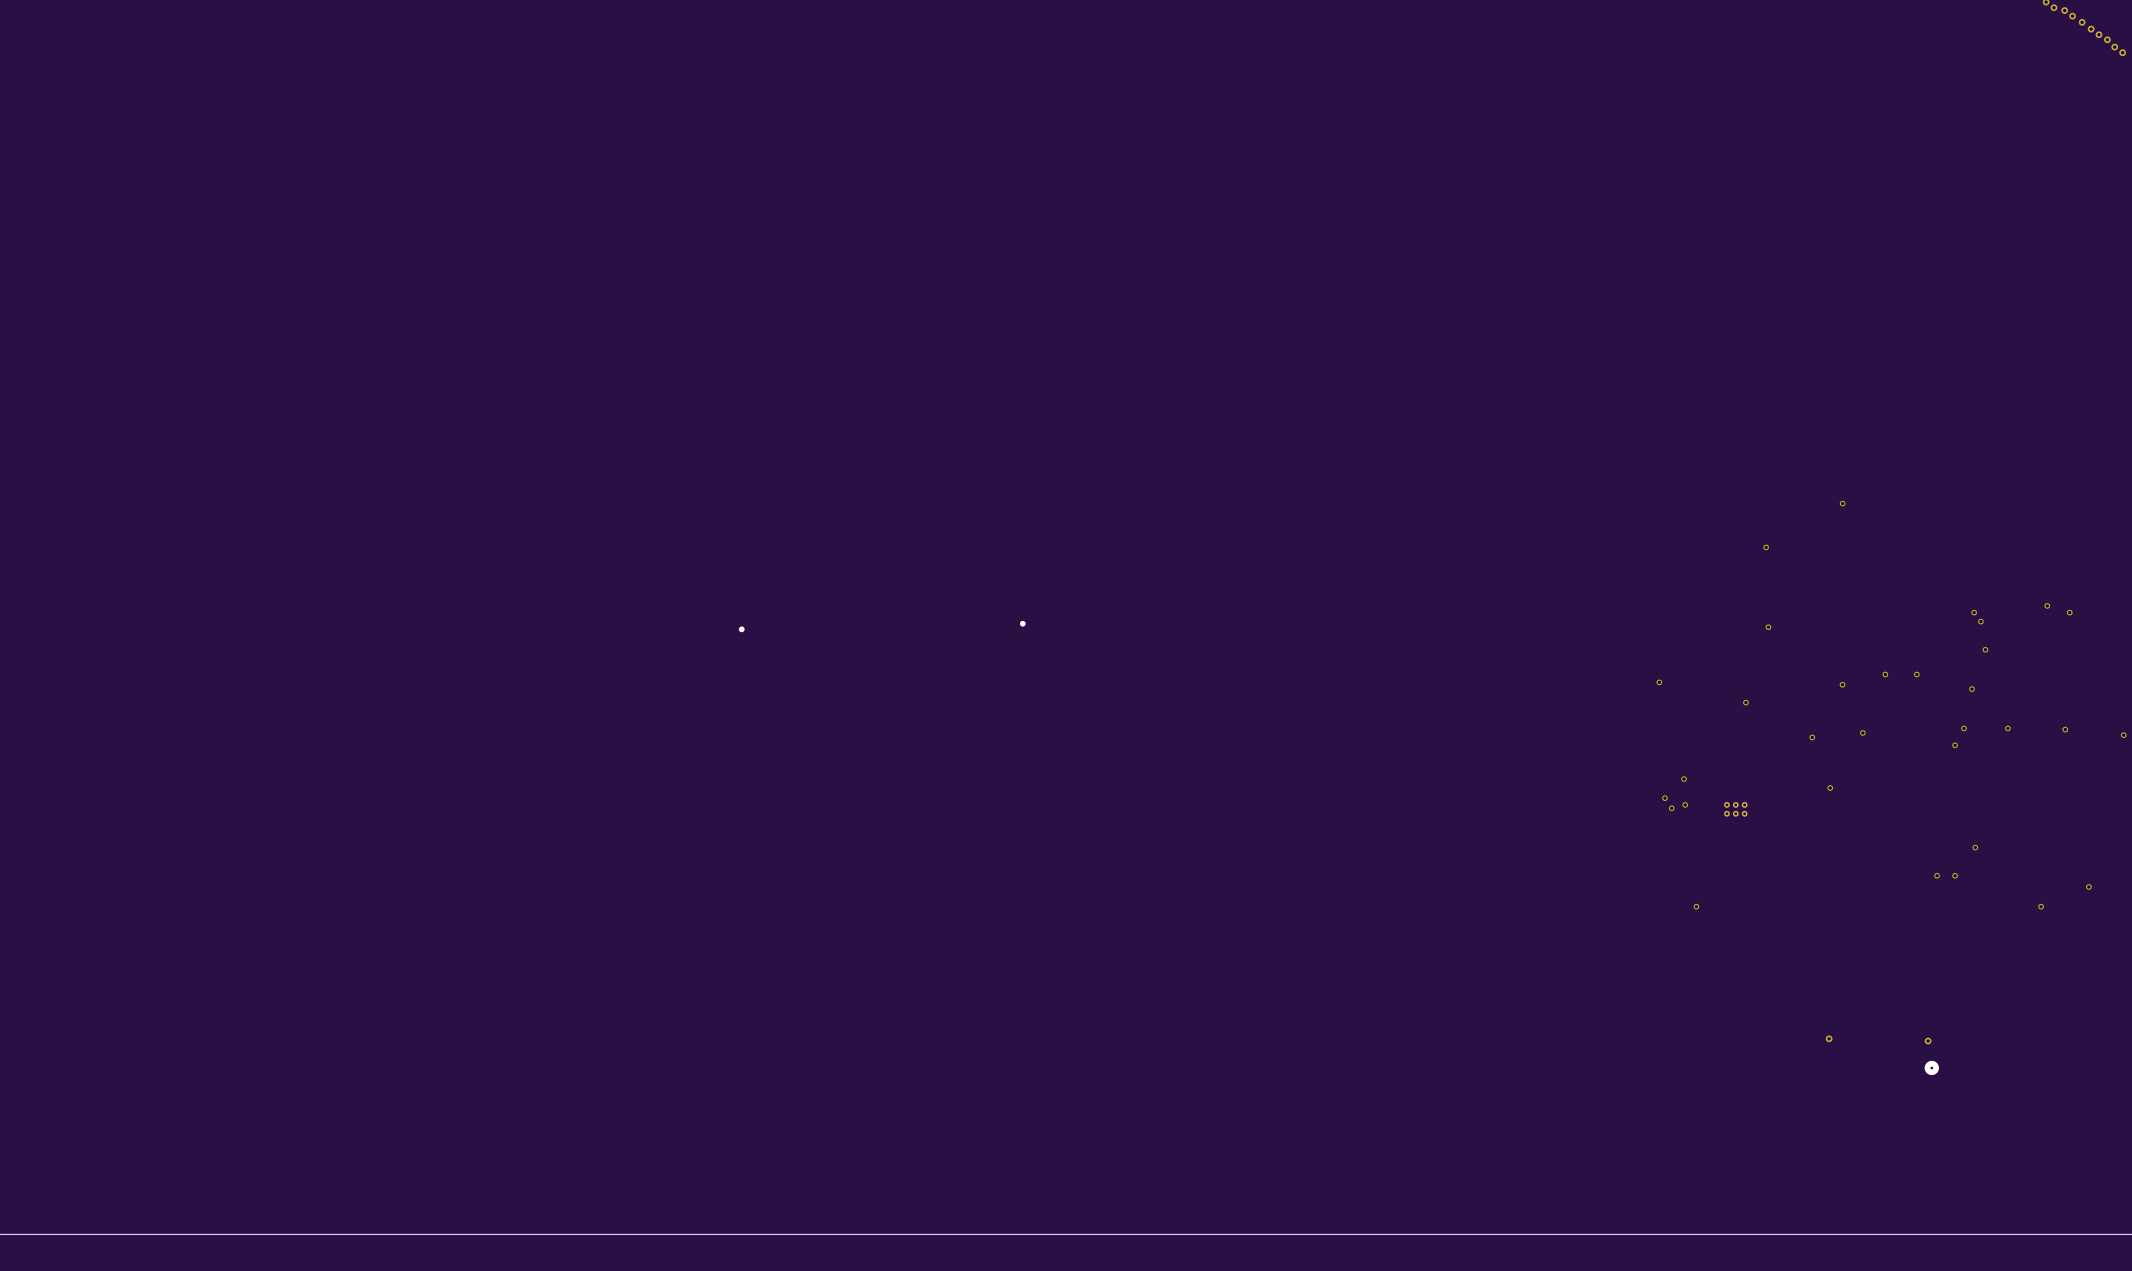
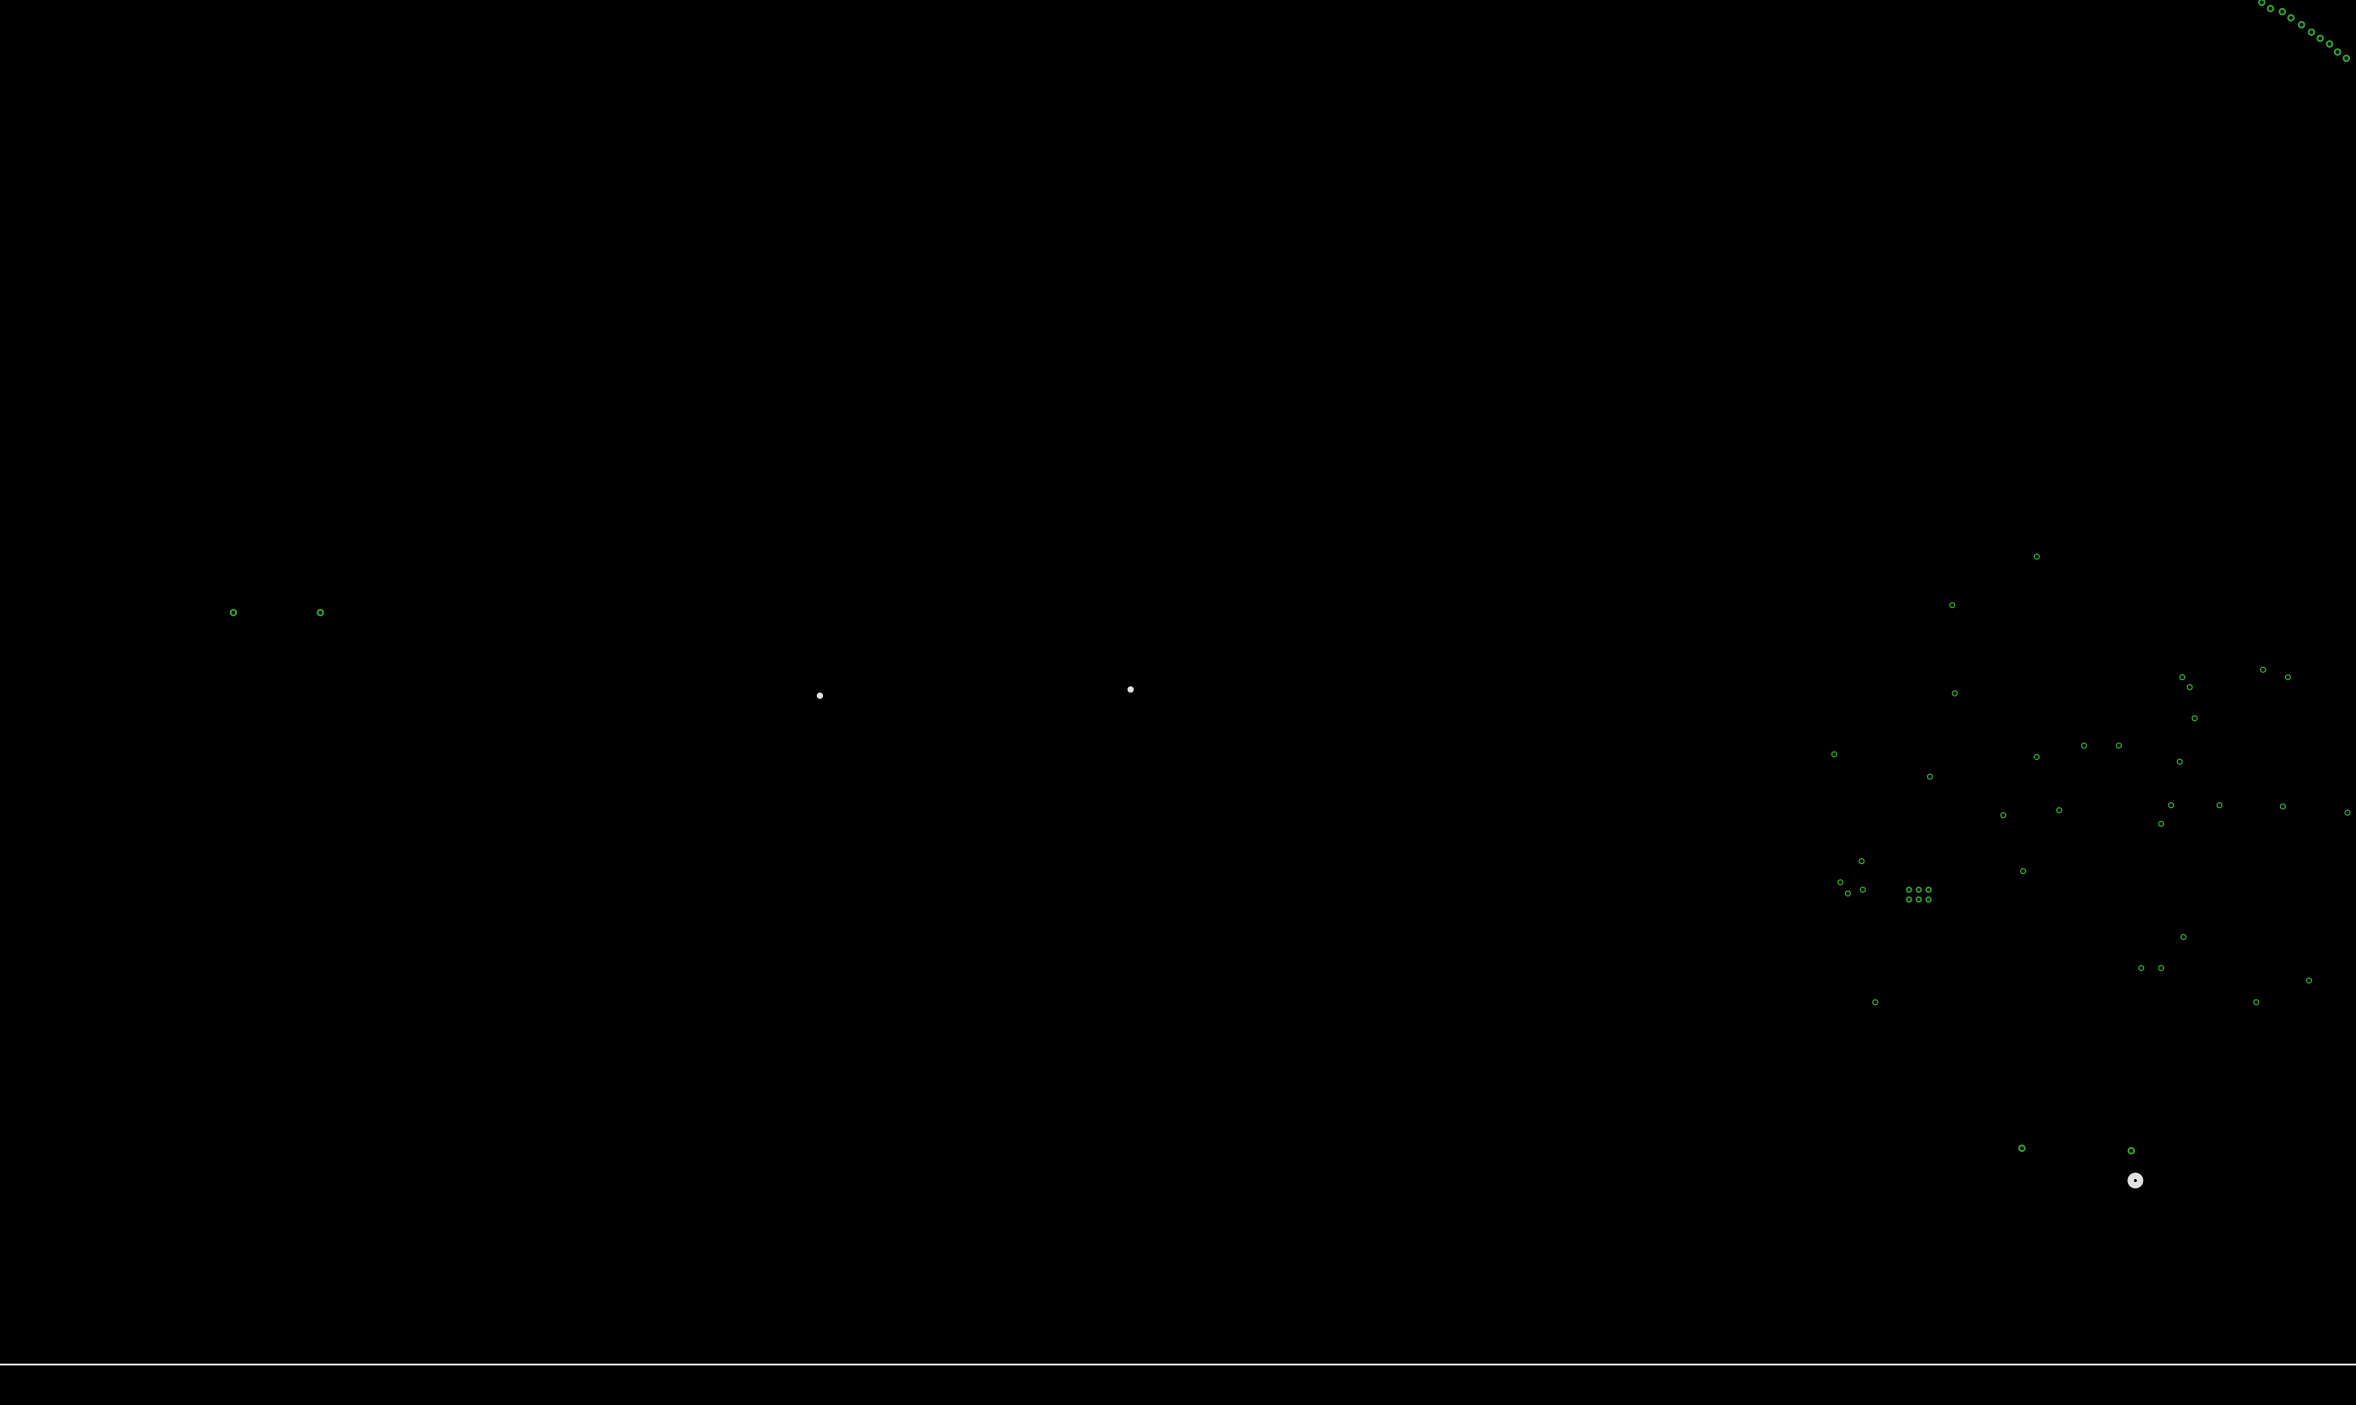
via: none -> (233, 612)
via: none -> (320, 612)

